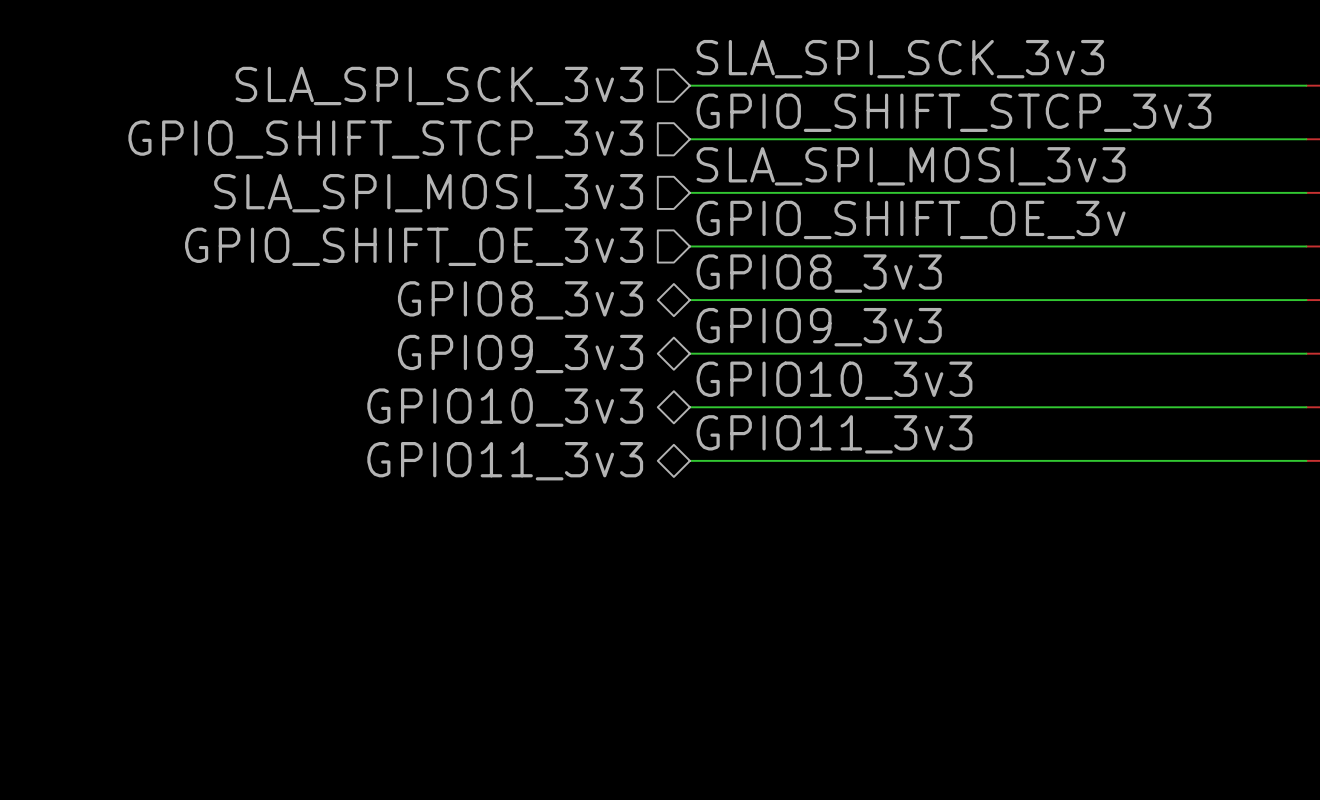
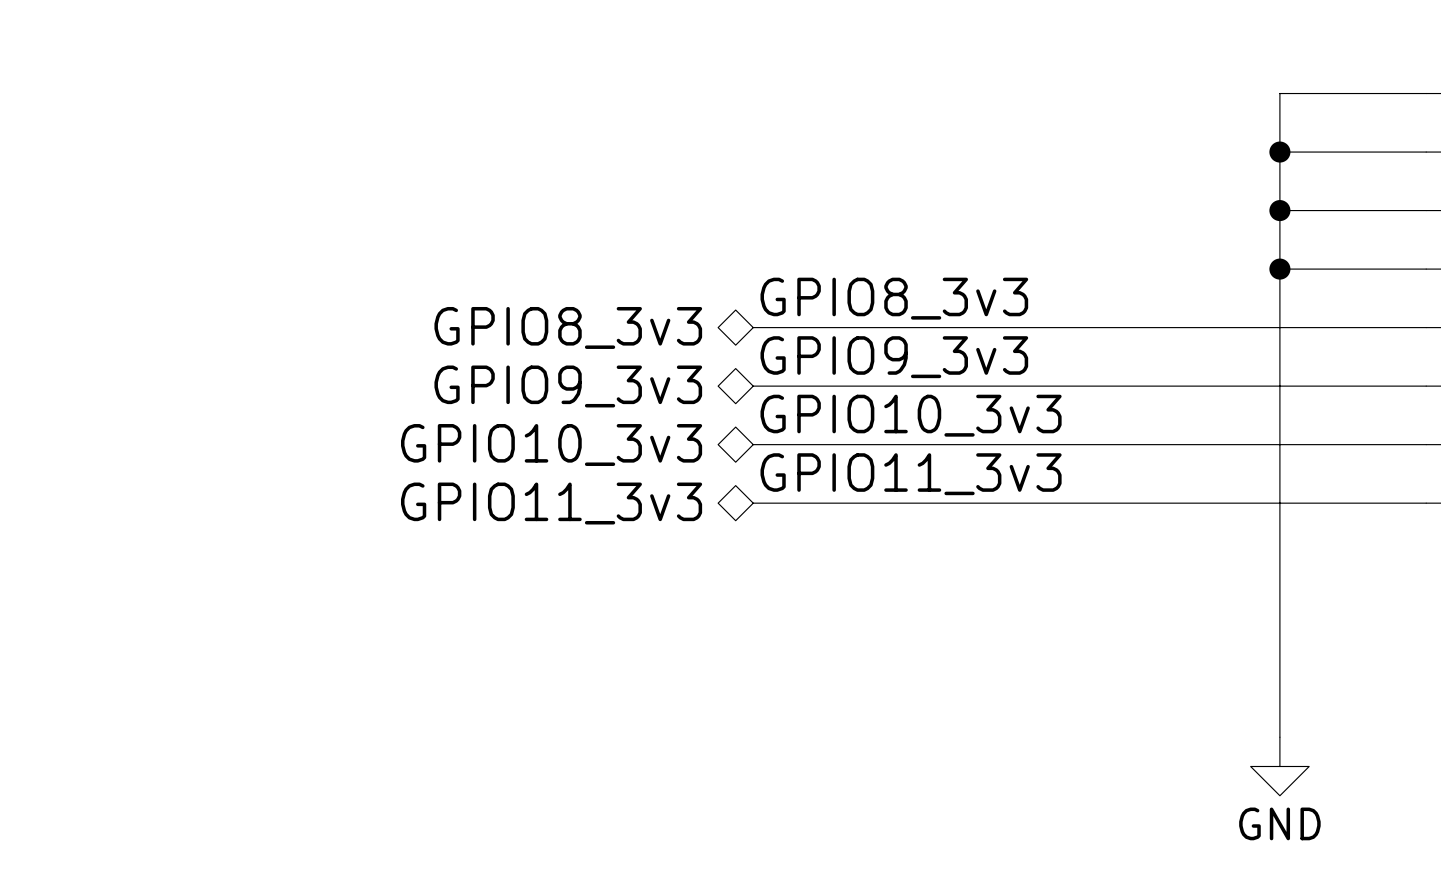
label: SLA_SPI_SCK_3v3 (900, 59) -> none
wire: (689, 85) (1172, 85) -> (1279, 737) (1279, 93)
hierarchical label: SLA_SPI_SCK_3v3 (439, 86) -> none
label: GPIO_SHIFT_STCP_3v3 (953, 112) -> none
hierarchical label: GPIO_SHIFT_STCP_3v3 (385, 139) -> none
wire: (689, 139) (1172, 139) -> none
junction: none -> (1279, 152)
label: SLA_SPI_MOSI_3v3 (911, 166) -> none
wire: (689, 192) (1172, 192) -> none
junction: none -> (1279, 210)
hierarchical label: SLA_SPI_MOSI_3v3 (428, 193) -> none
label: GPIO_SHIFT_OE_3v (911, 219) -> none
hierarchical label: GPIO_SHIFT_OE_3v3 (414, 246) -> none
wire: (689, 246) (1172, 246) -> none
junction: none -> (1279, 269)
power symbol: none -> GND (1279, 766)

